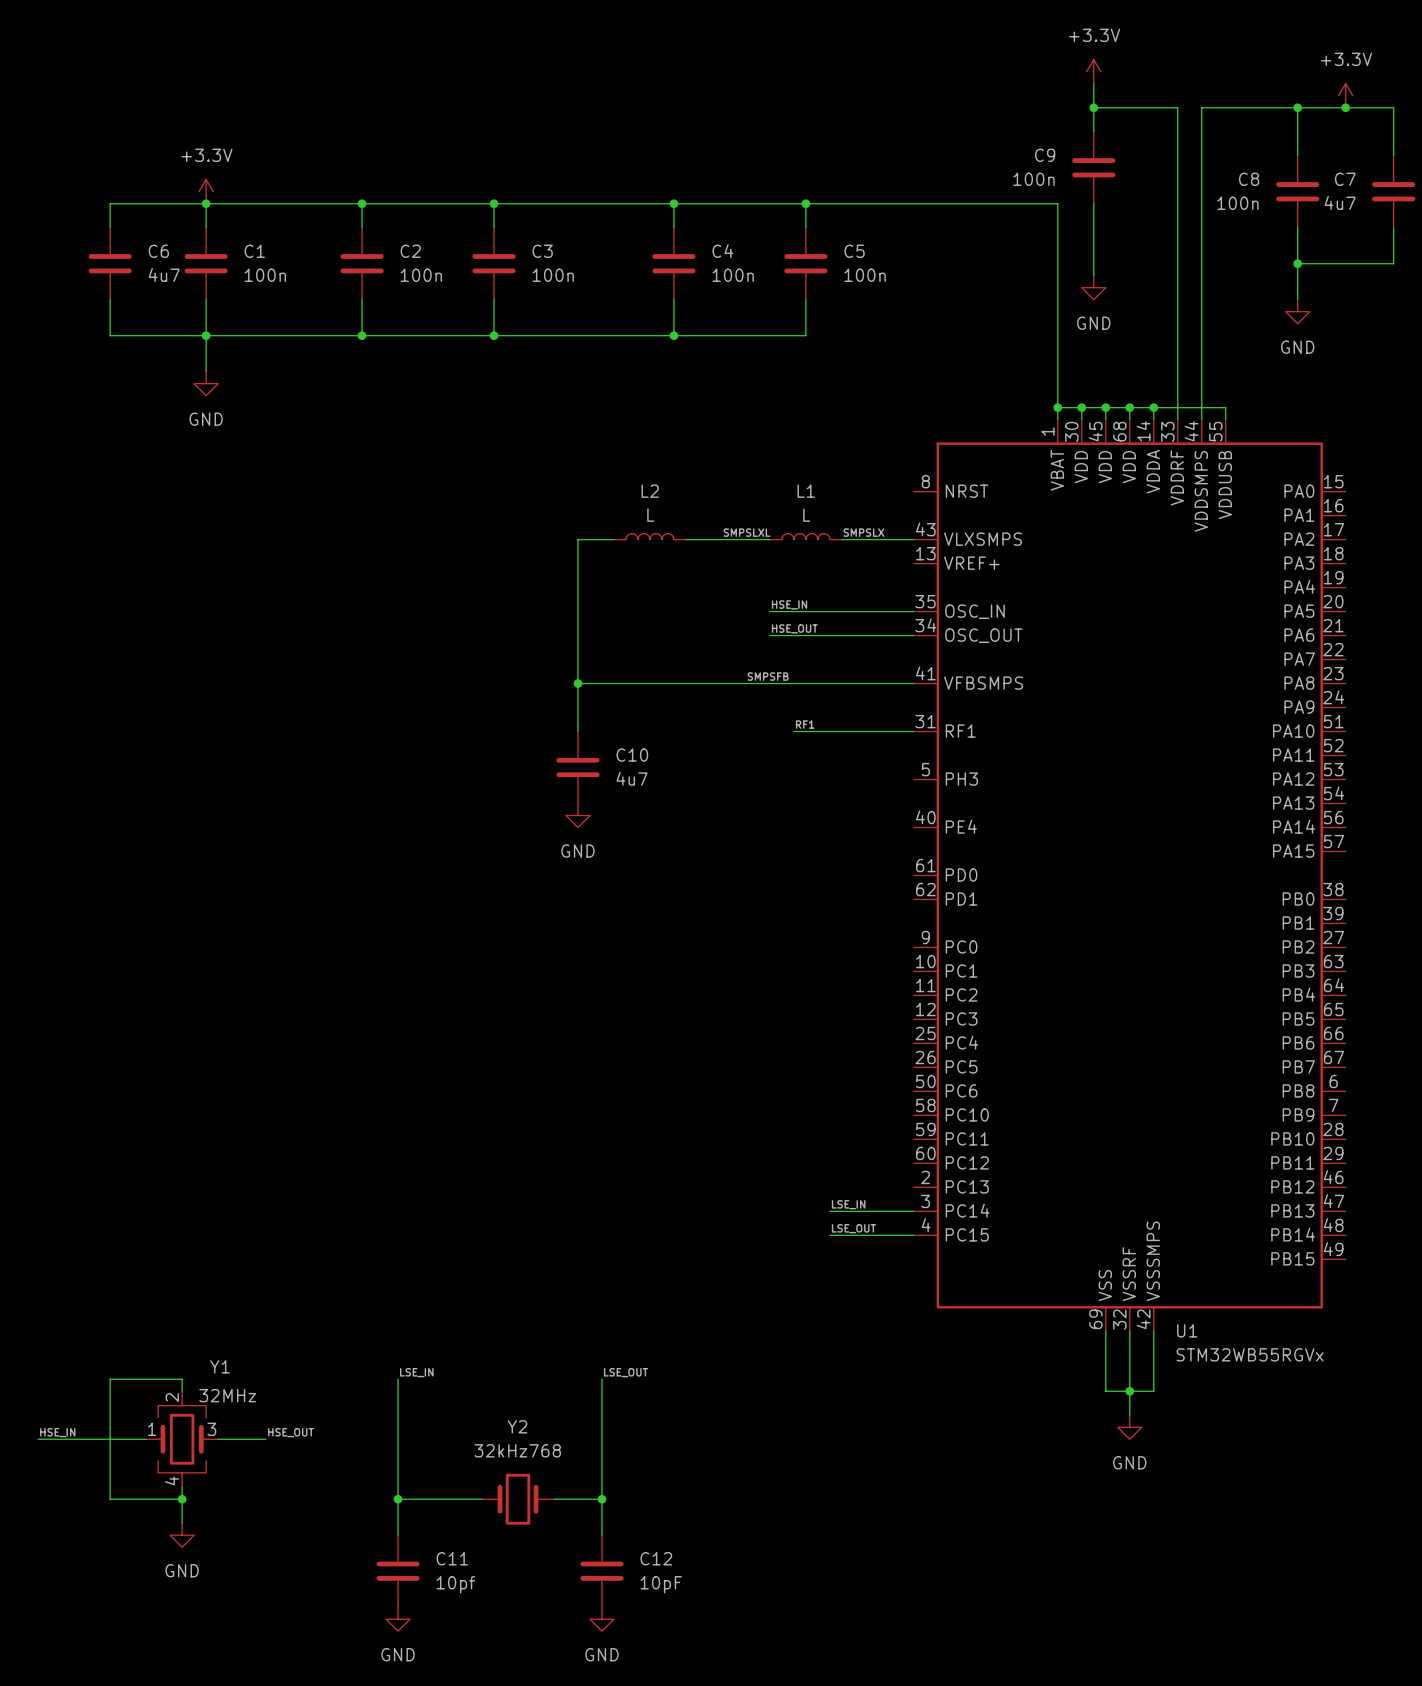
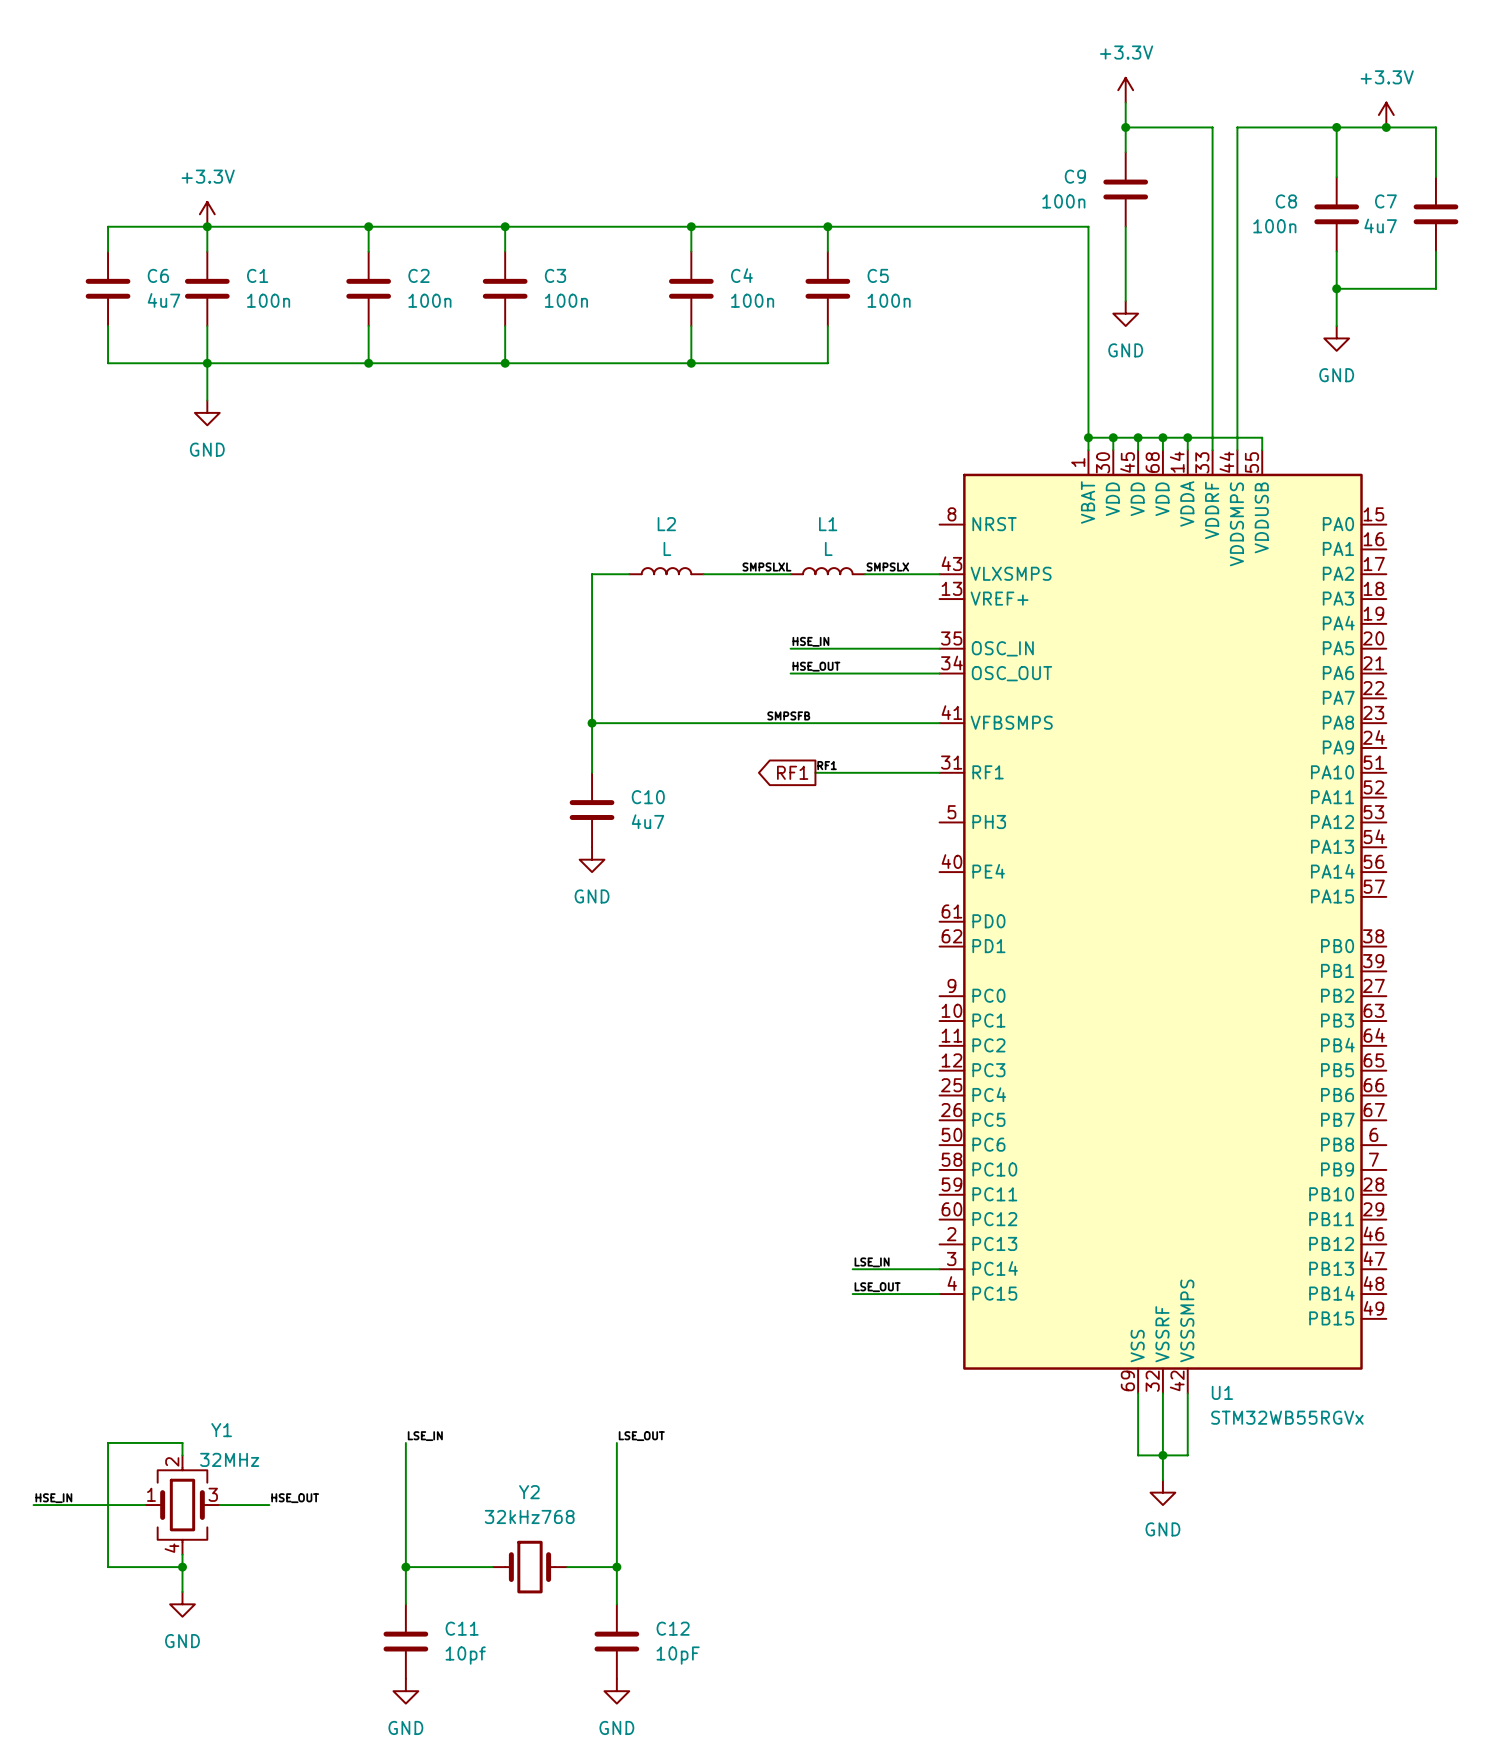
global label: none -> RF1 (792, 772)

